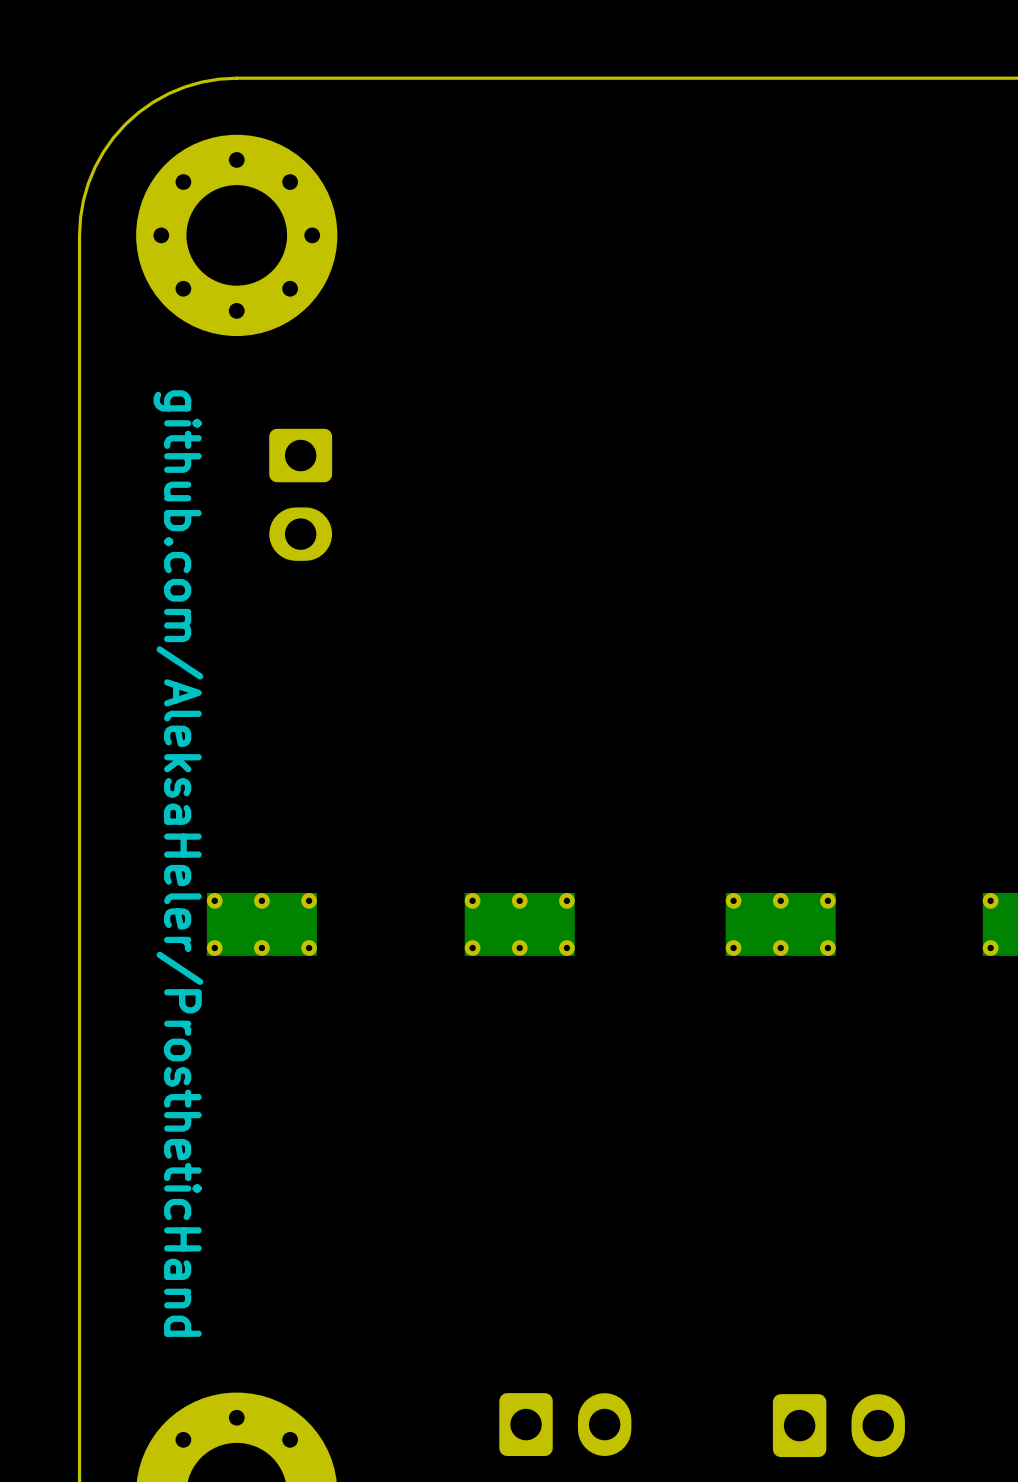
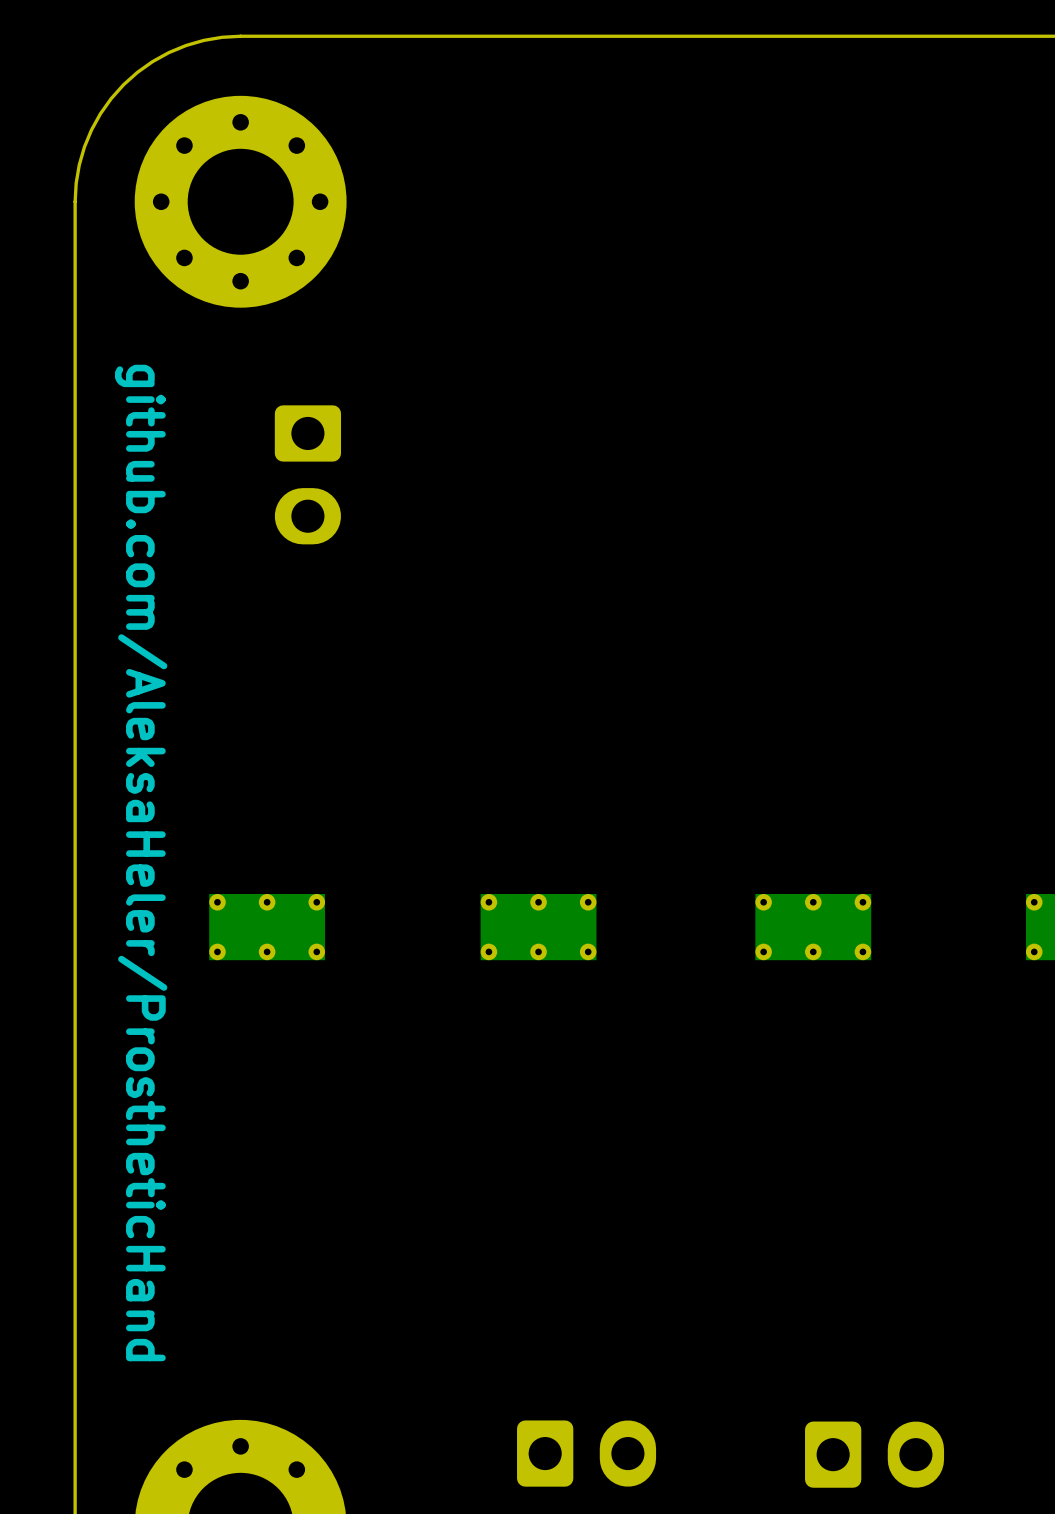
text position: github.com/AleksaHeler/ProstheticHand (178, 863) -> github.com/AleksaHeler/ProstheticHand (141, 863)

